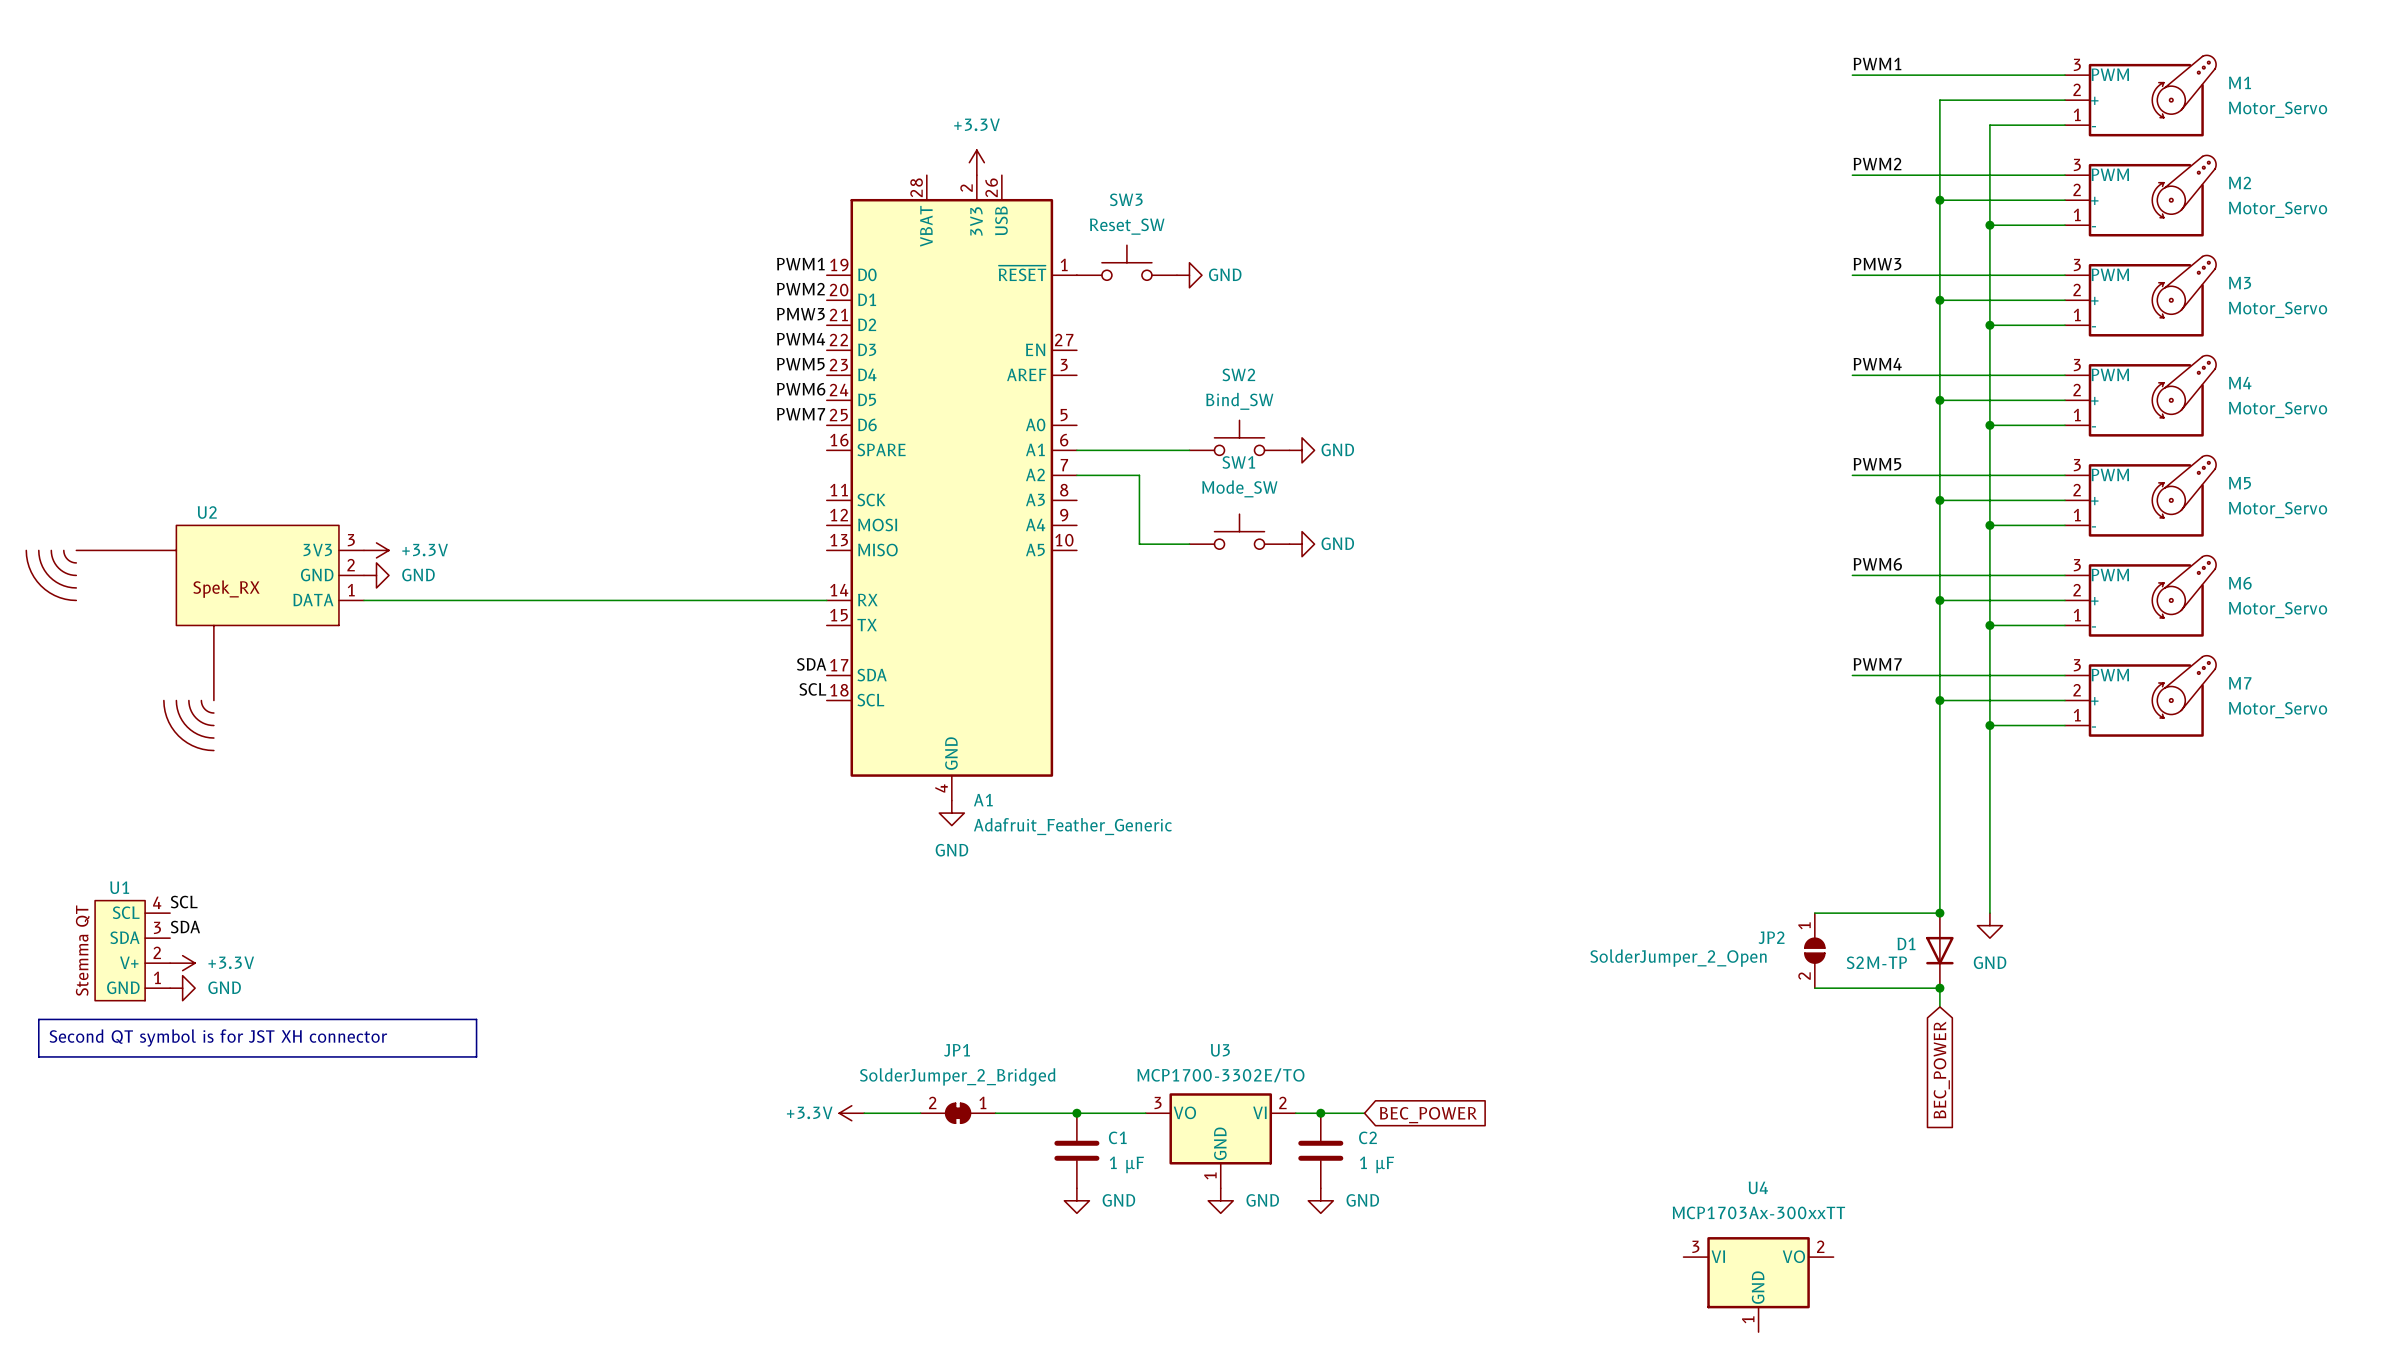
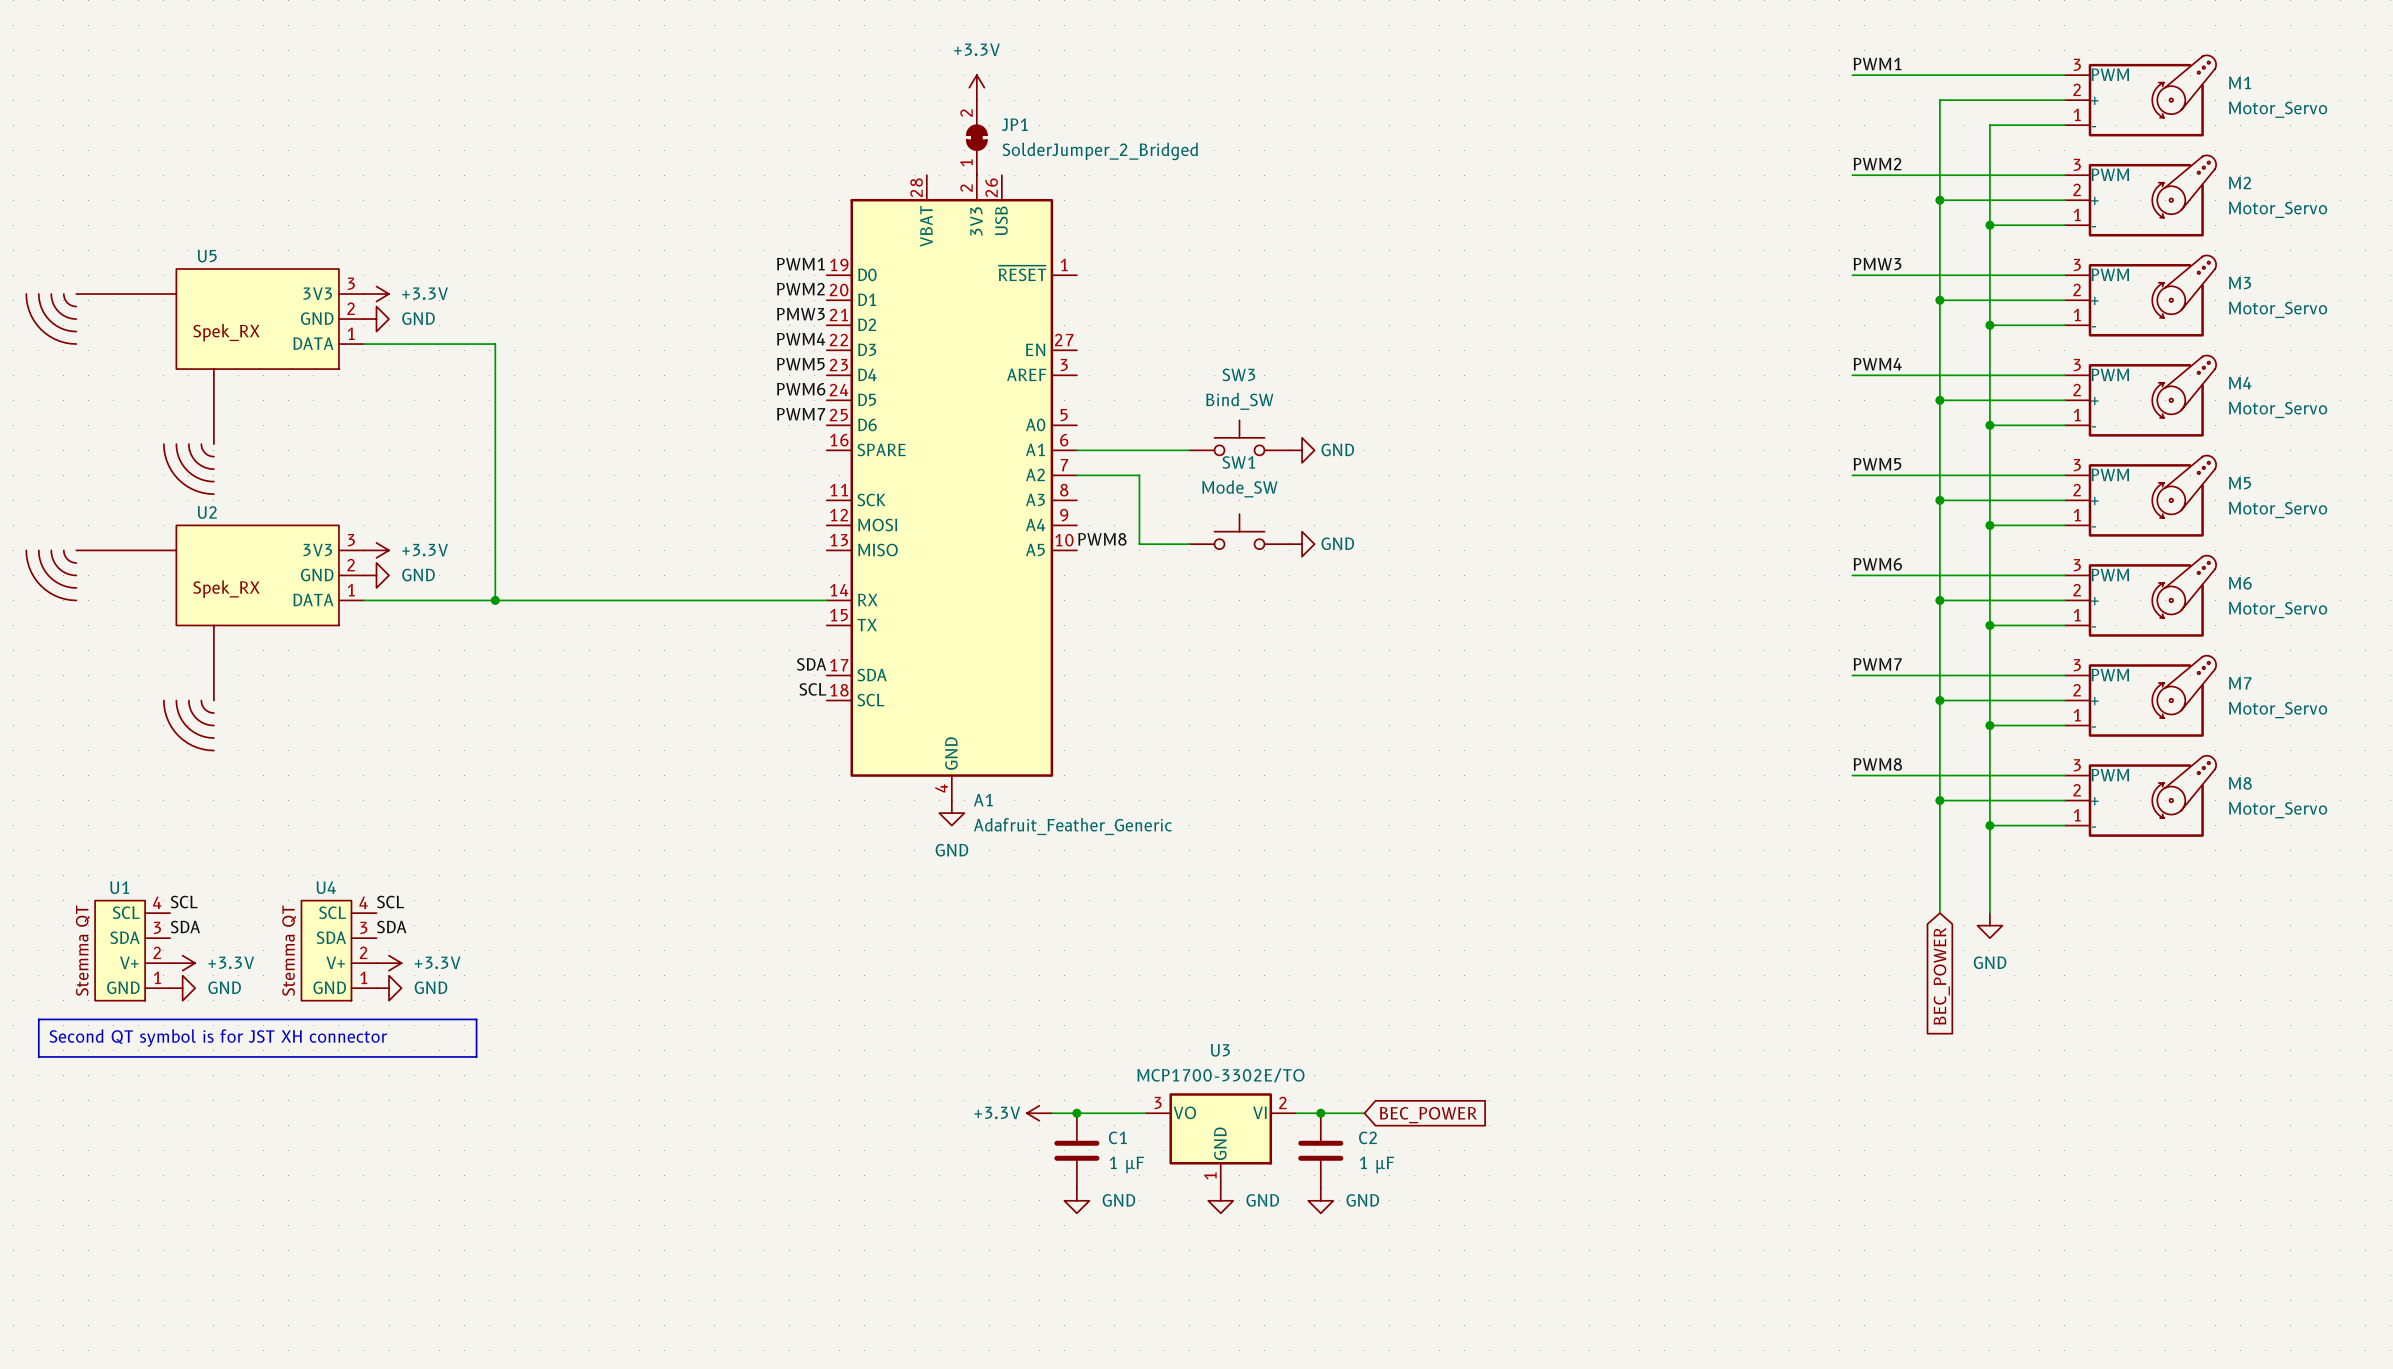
power symbol position: +3.3V (976, 162) -> +3.3V (976, 87)
SW3: Reset_SW (1126, 262) -> none
power symbol: GND (1189, 275) -> none
power symbol: none -> +3.3V (376, 294)
power symbol: none -> GND (376, 319)
wire: none -> (363, 344) (495, 344) (495, 600)
SW2 name: SW2 (1238, 374) -> SW3 (1238, 374)
U5: none -> (195, 381)
label: none -> PWM8 (1102, 539)
junction: none -> (495, 600)
label: none -> PWM8 (1877, 764)
wire: none -> (1852, 775) (2064, 775)
M8: none -> Motor_Servo (2140, 796)
junction: none -> (1939, 800)
wire: none -> (1989, 825) (2064, 825)
junction: none -> (1989, 825)
label: none -> SCL (390, 902)
wire: (1814, 913) (1939, 913) -> (1939, 800) (2064, 800)
junction: (1939, 913) -> none
label: none -> SDA (391, 927)
JP2: SolderJumper_2_Open (1814, 950) -> none
D1: S2M-TP (1939, 950) -> none
power symbol: none -> +3.3V (389, 963)
power symbol: none -> GND (389, 988)
wire: (1814, 988) (1939, 988) (1939, 1006) -> none
junction: (1939, 988) -> none
JP1 name position: JP1 (957, 1050) -> JP1 (1014, 124)
global label position: BEC_POWER (1941, 1069) -> BEC_POWER (1941, 976)
JP1 value position: SolderJumper_2_Bridged (957, 1076) -> SolderJumper_2_Bridged (1100, 151)
power symbol position: +3.3V (851, 1113) -> +3.3V (1039, 1113)
wire: (864, 1113) (920, 1113) -> none
JP1 rotation: 0° (958, 1113) -> 90° clockwise (976, 137)
JP1 position: (958, 1113) -> (976, 137)
U4 name position: U4 (1758, 1187) -> U4 (326, 887)
U4 value: MCP1703Ax-300xxTT (1758, 1212) -> none
U4 symbol: [1683, 1237, 1834, 1333] -> [301, 900, 377, 1001]

